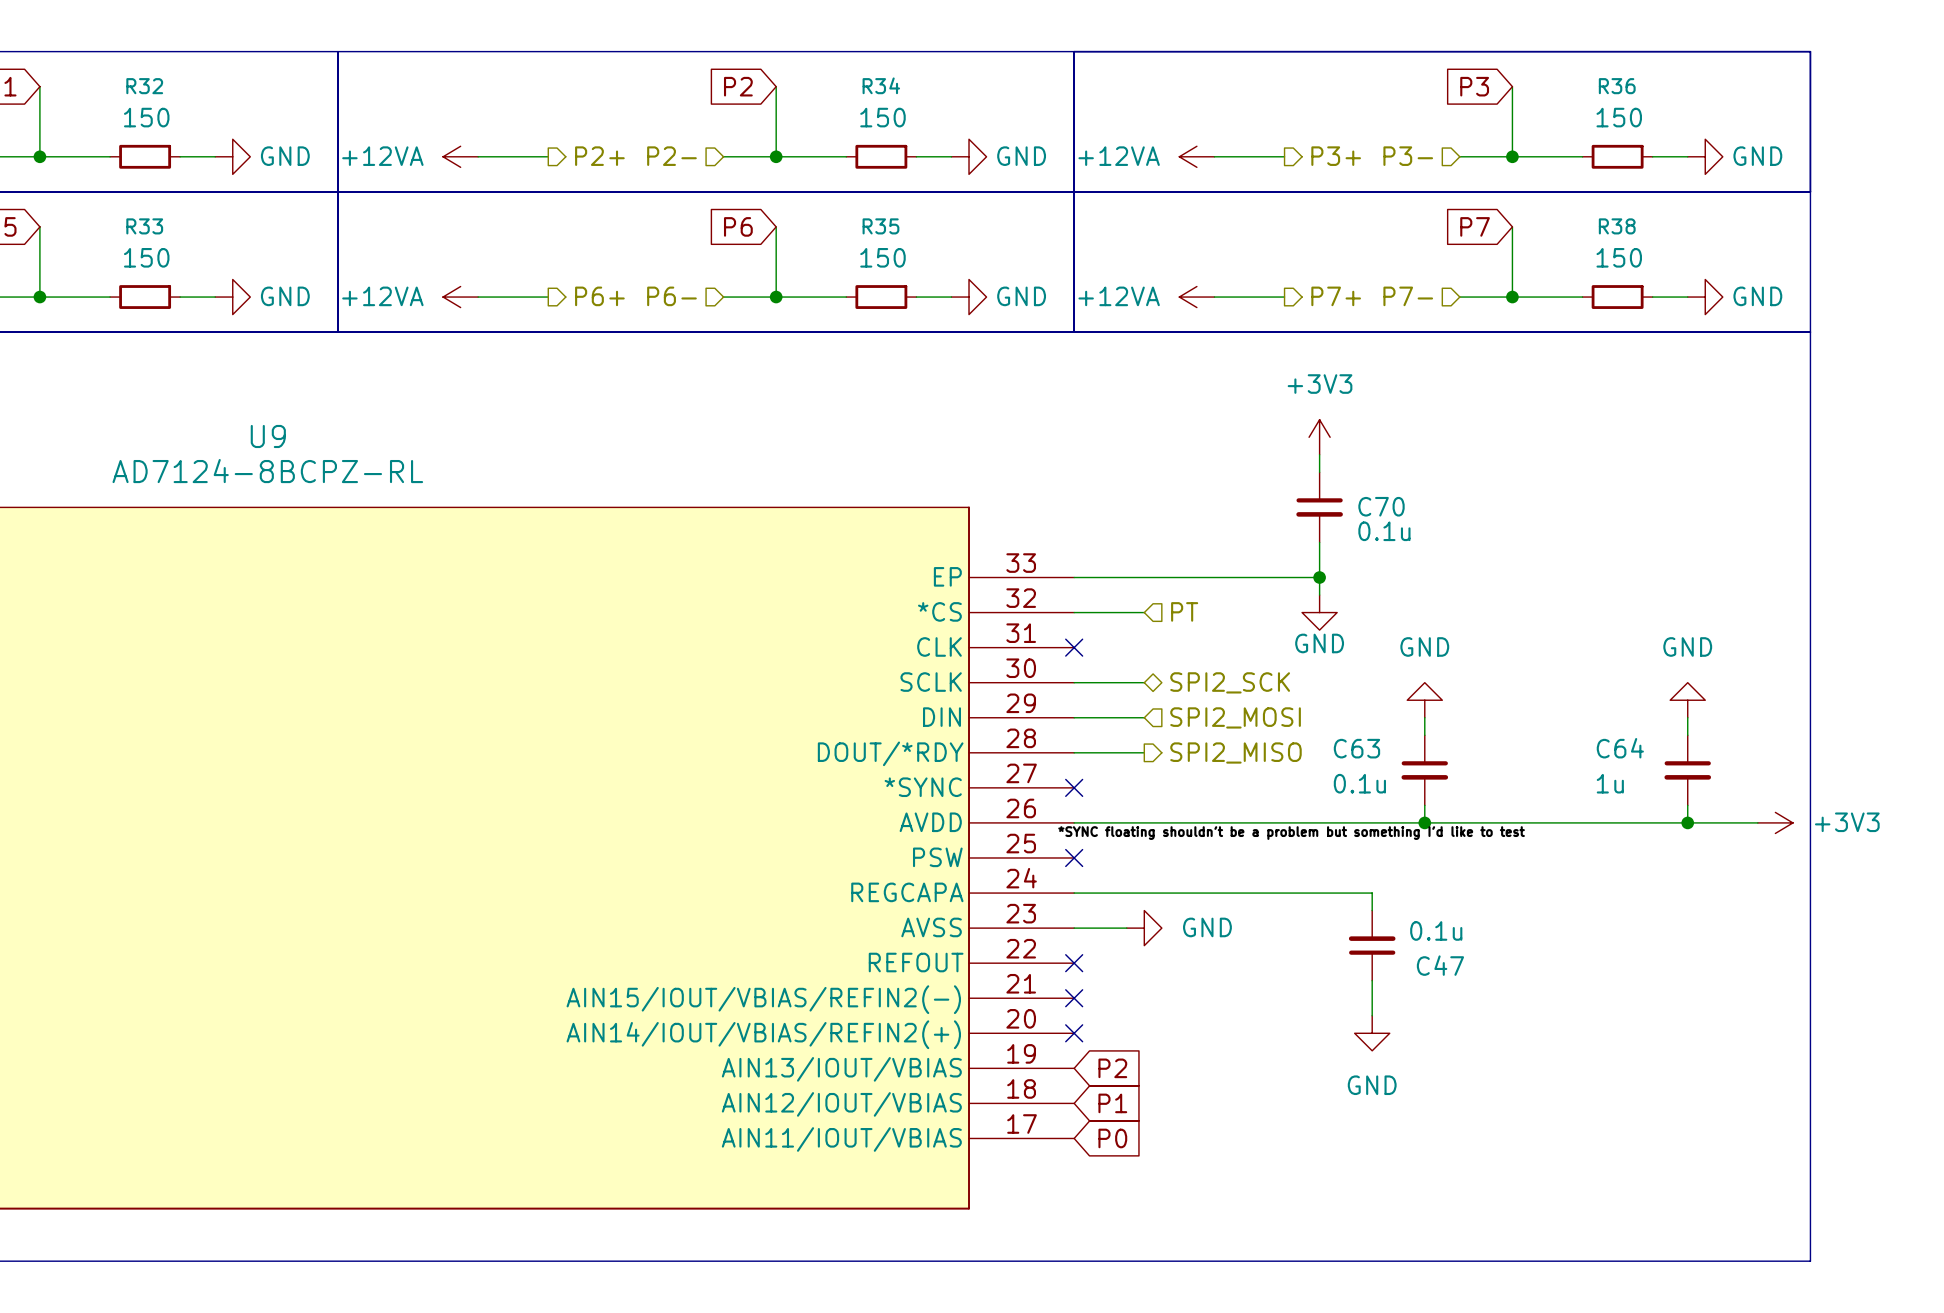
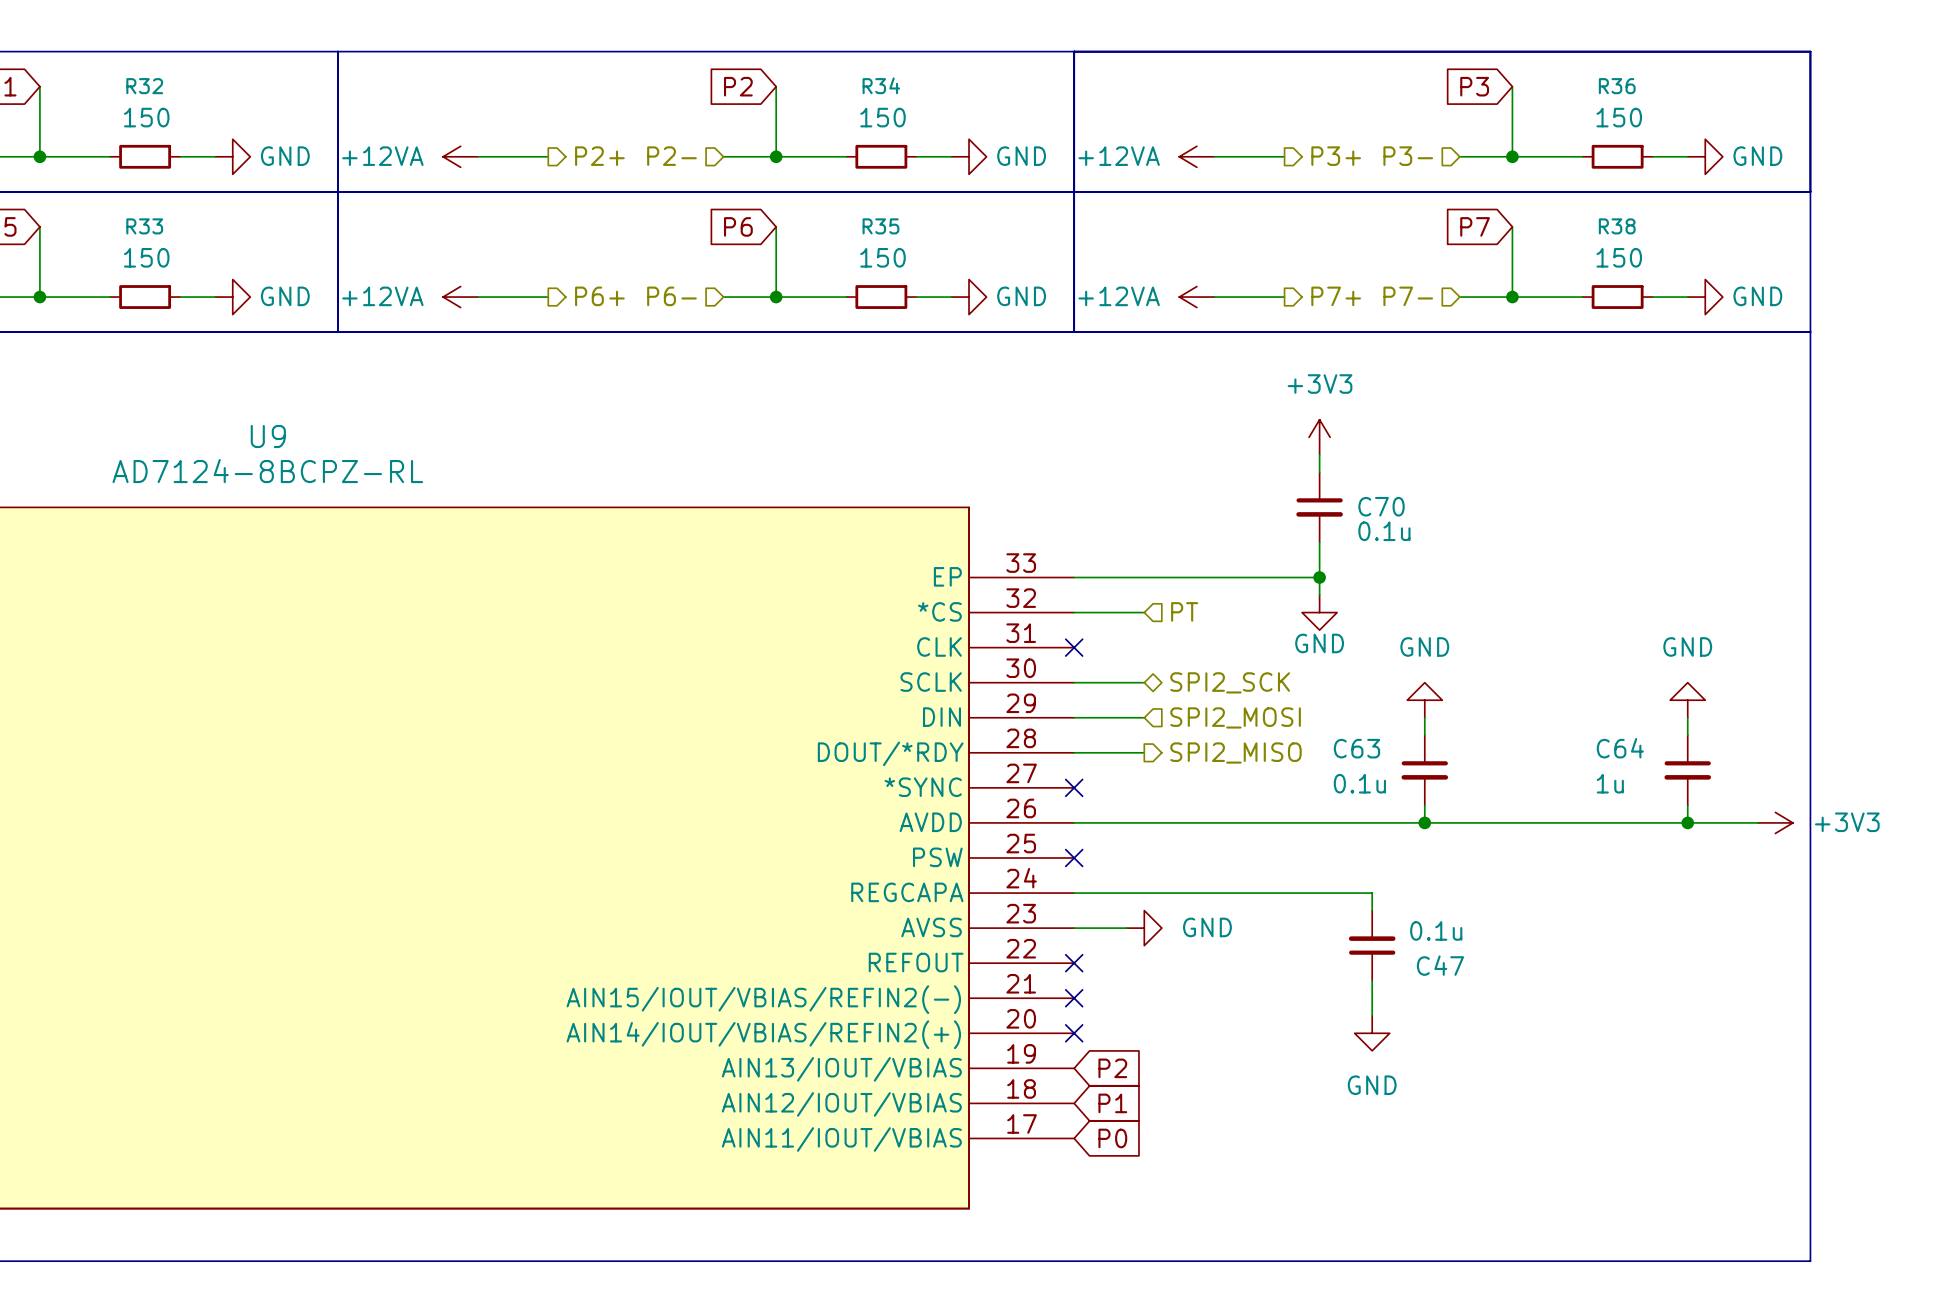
label: *SYNC floating shouldn't be a problem but something I'd like to test (1291, 833) -> none

